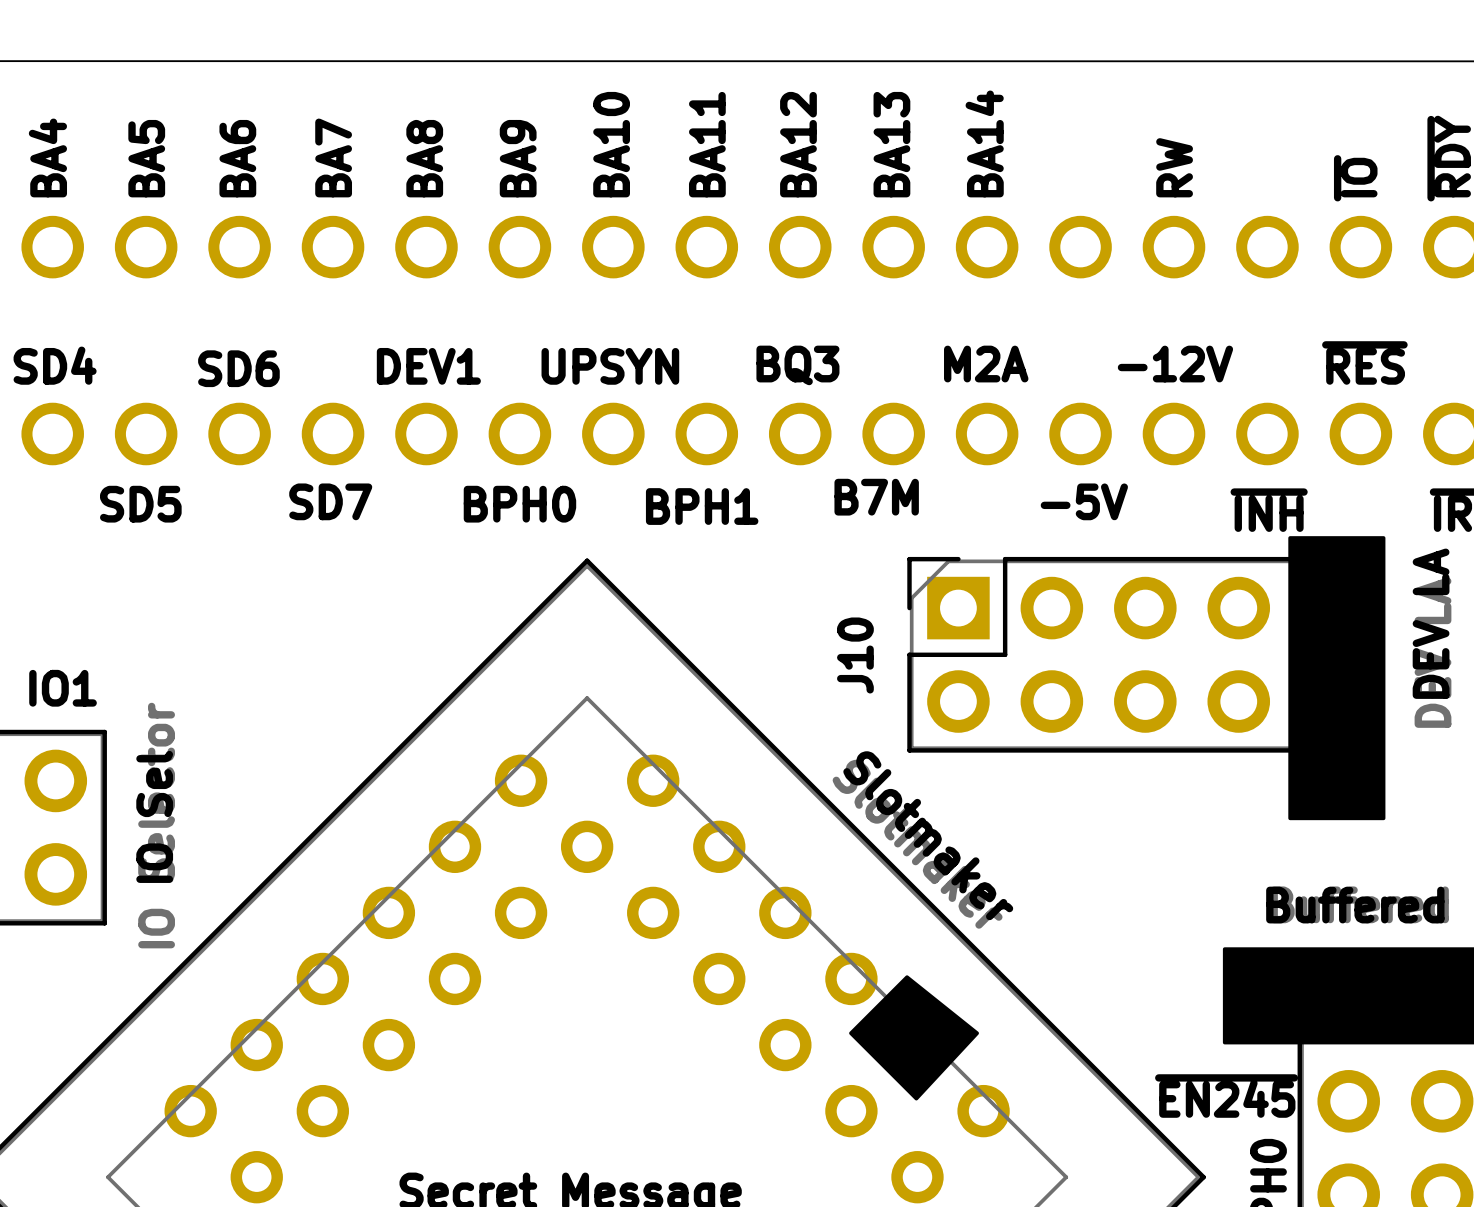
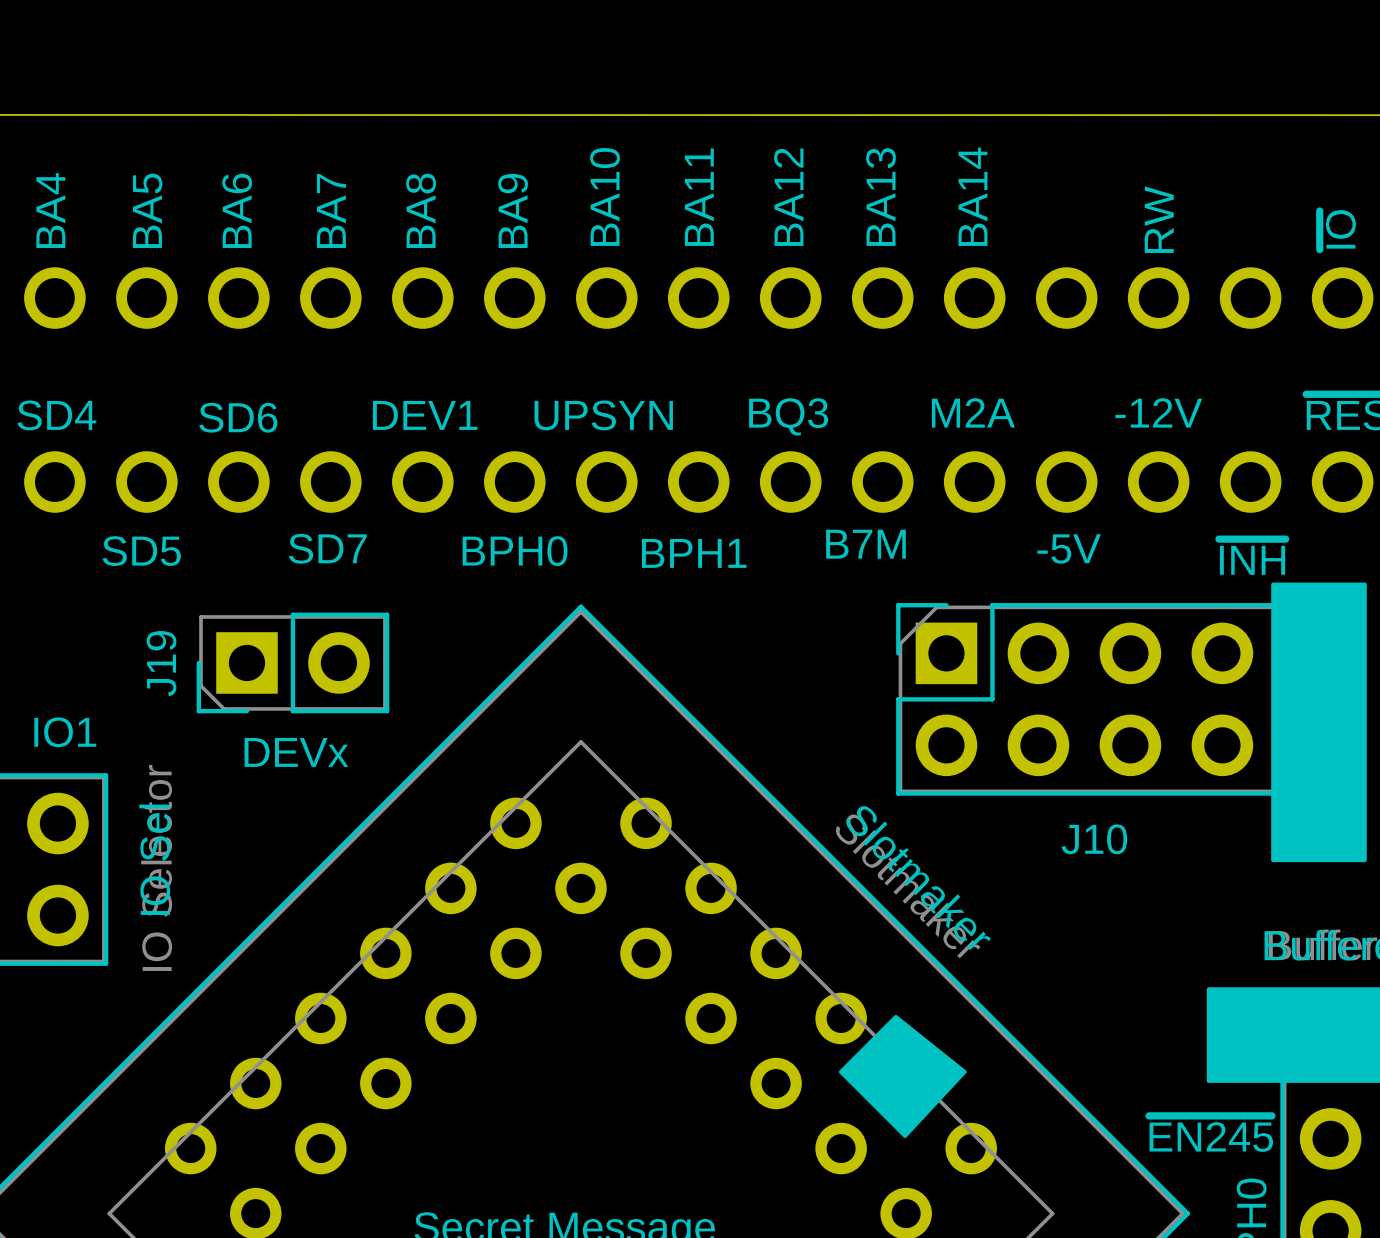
J19: none -> DEVx (292, 662)
J10 name rotation: 0° (855, 655) -> 90° clockwise (1094, 839)
J10 name position: J10 (855, 655) -> J10 (1094, 839)

